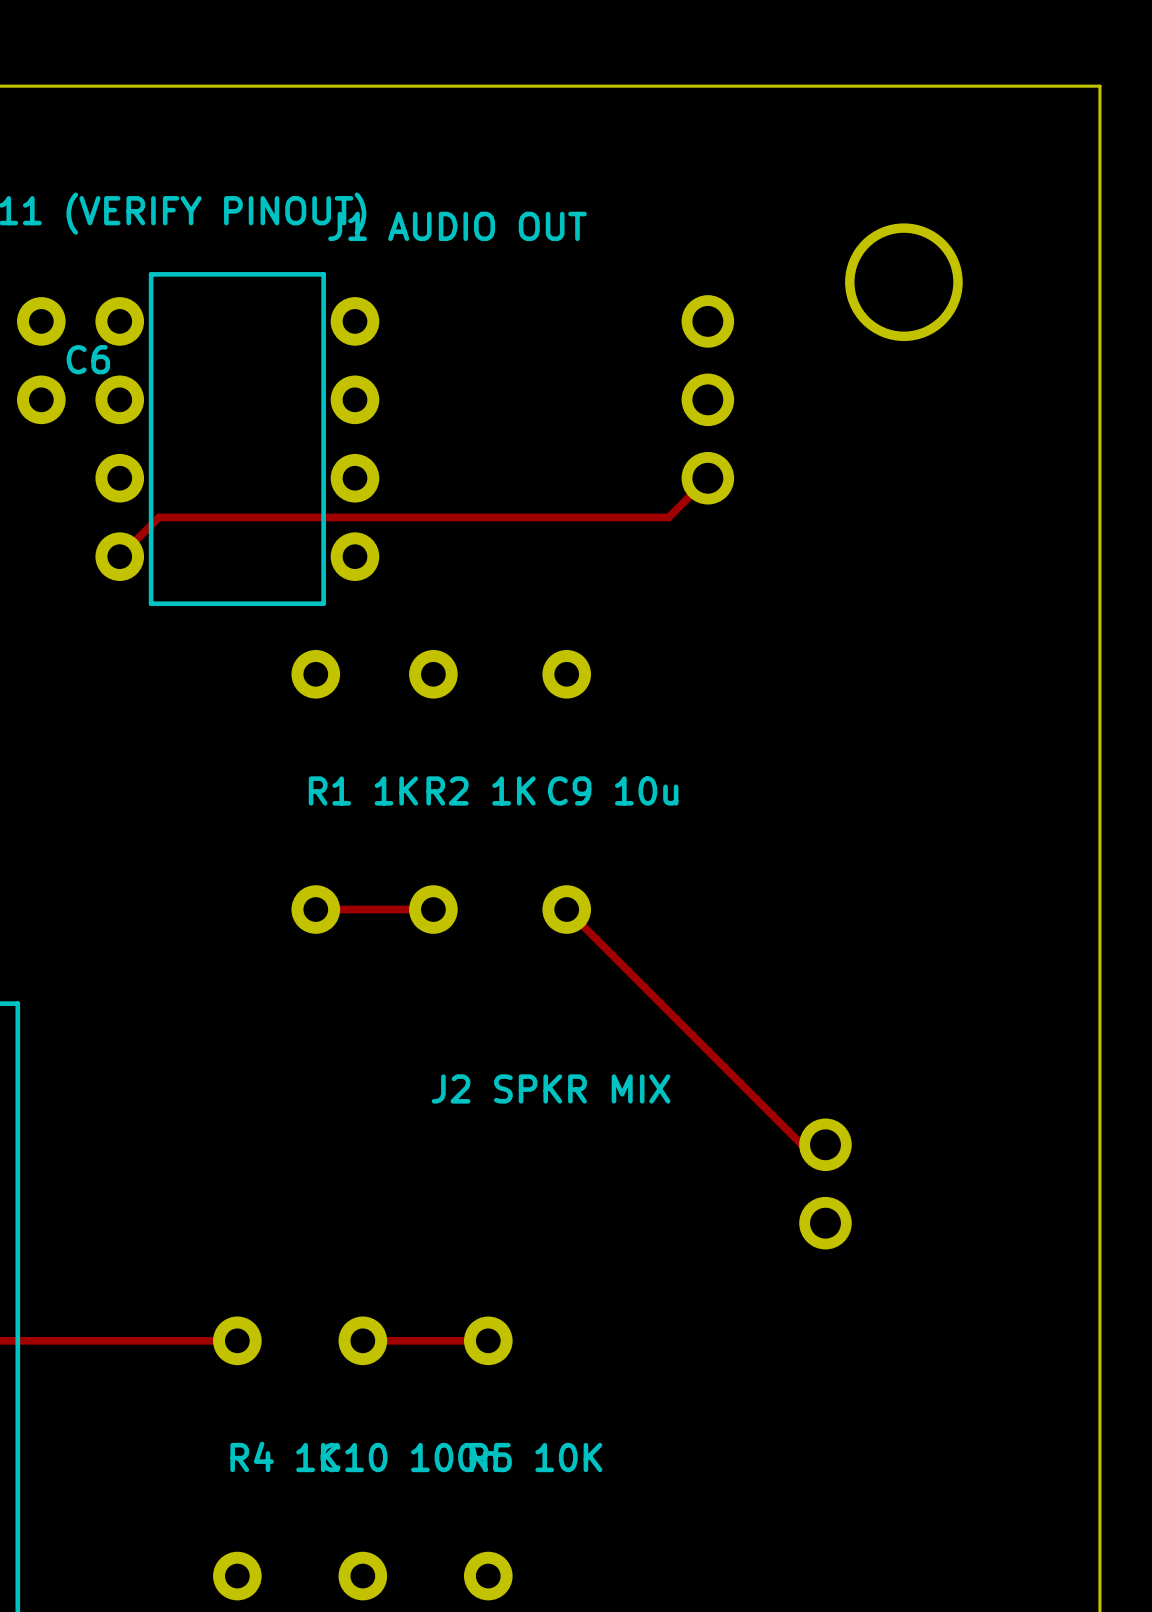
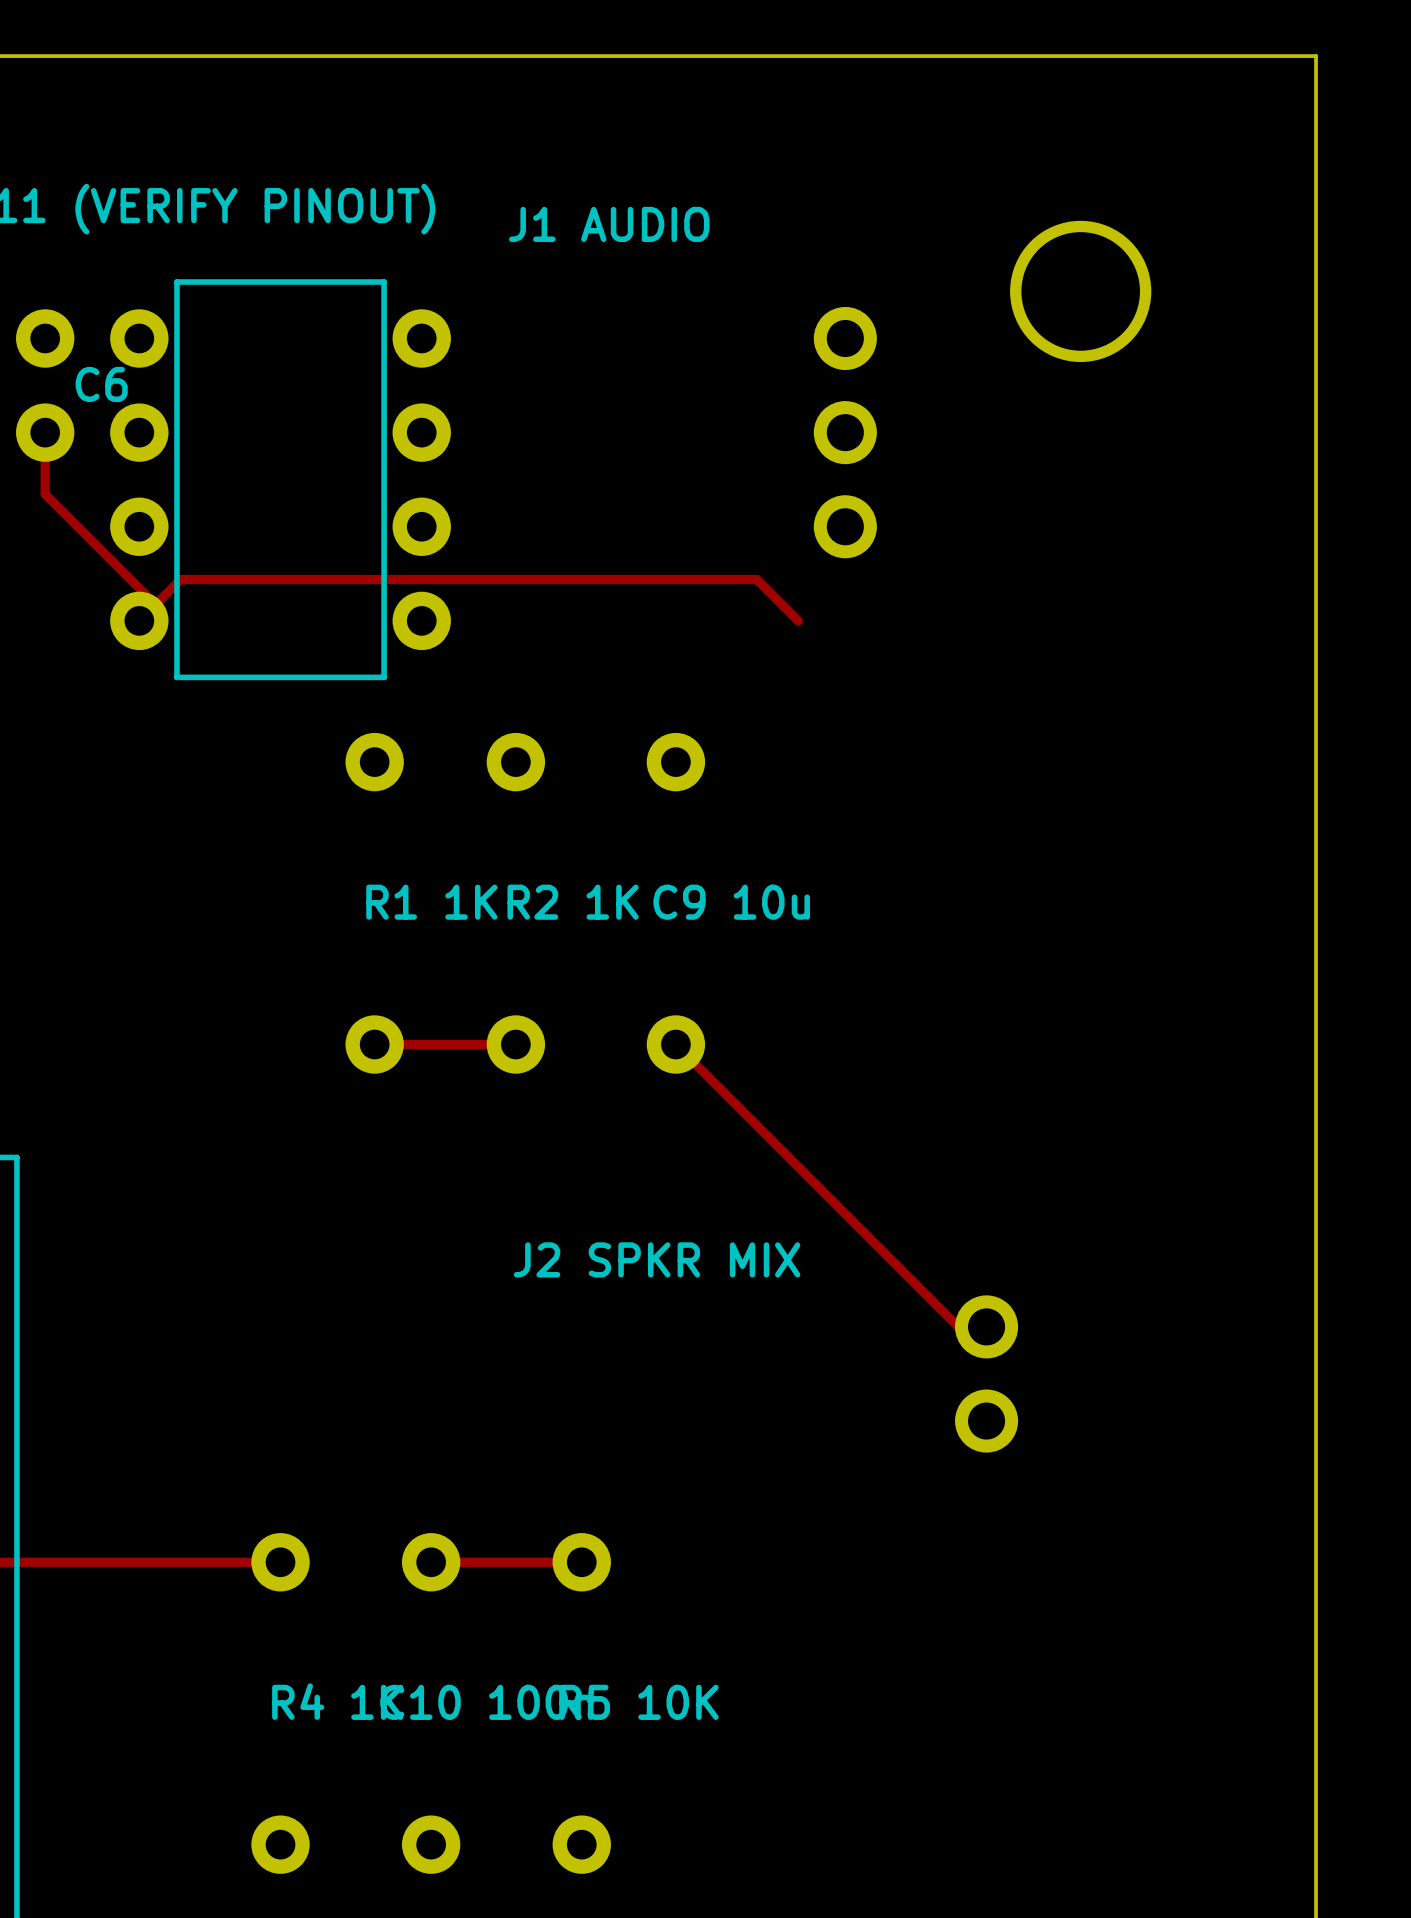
text: J1 AUDIO OUT (457, 226) -> J1 AUDIO (609, 224)
track: none -> (45, 432) (45, 494) (155, 604)
track: (707, 478) (668, 517) (158, 517) (154, 522) -> (798, 620) (756, 579) (180, 579)

